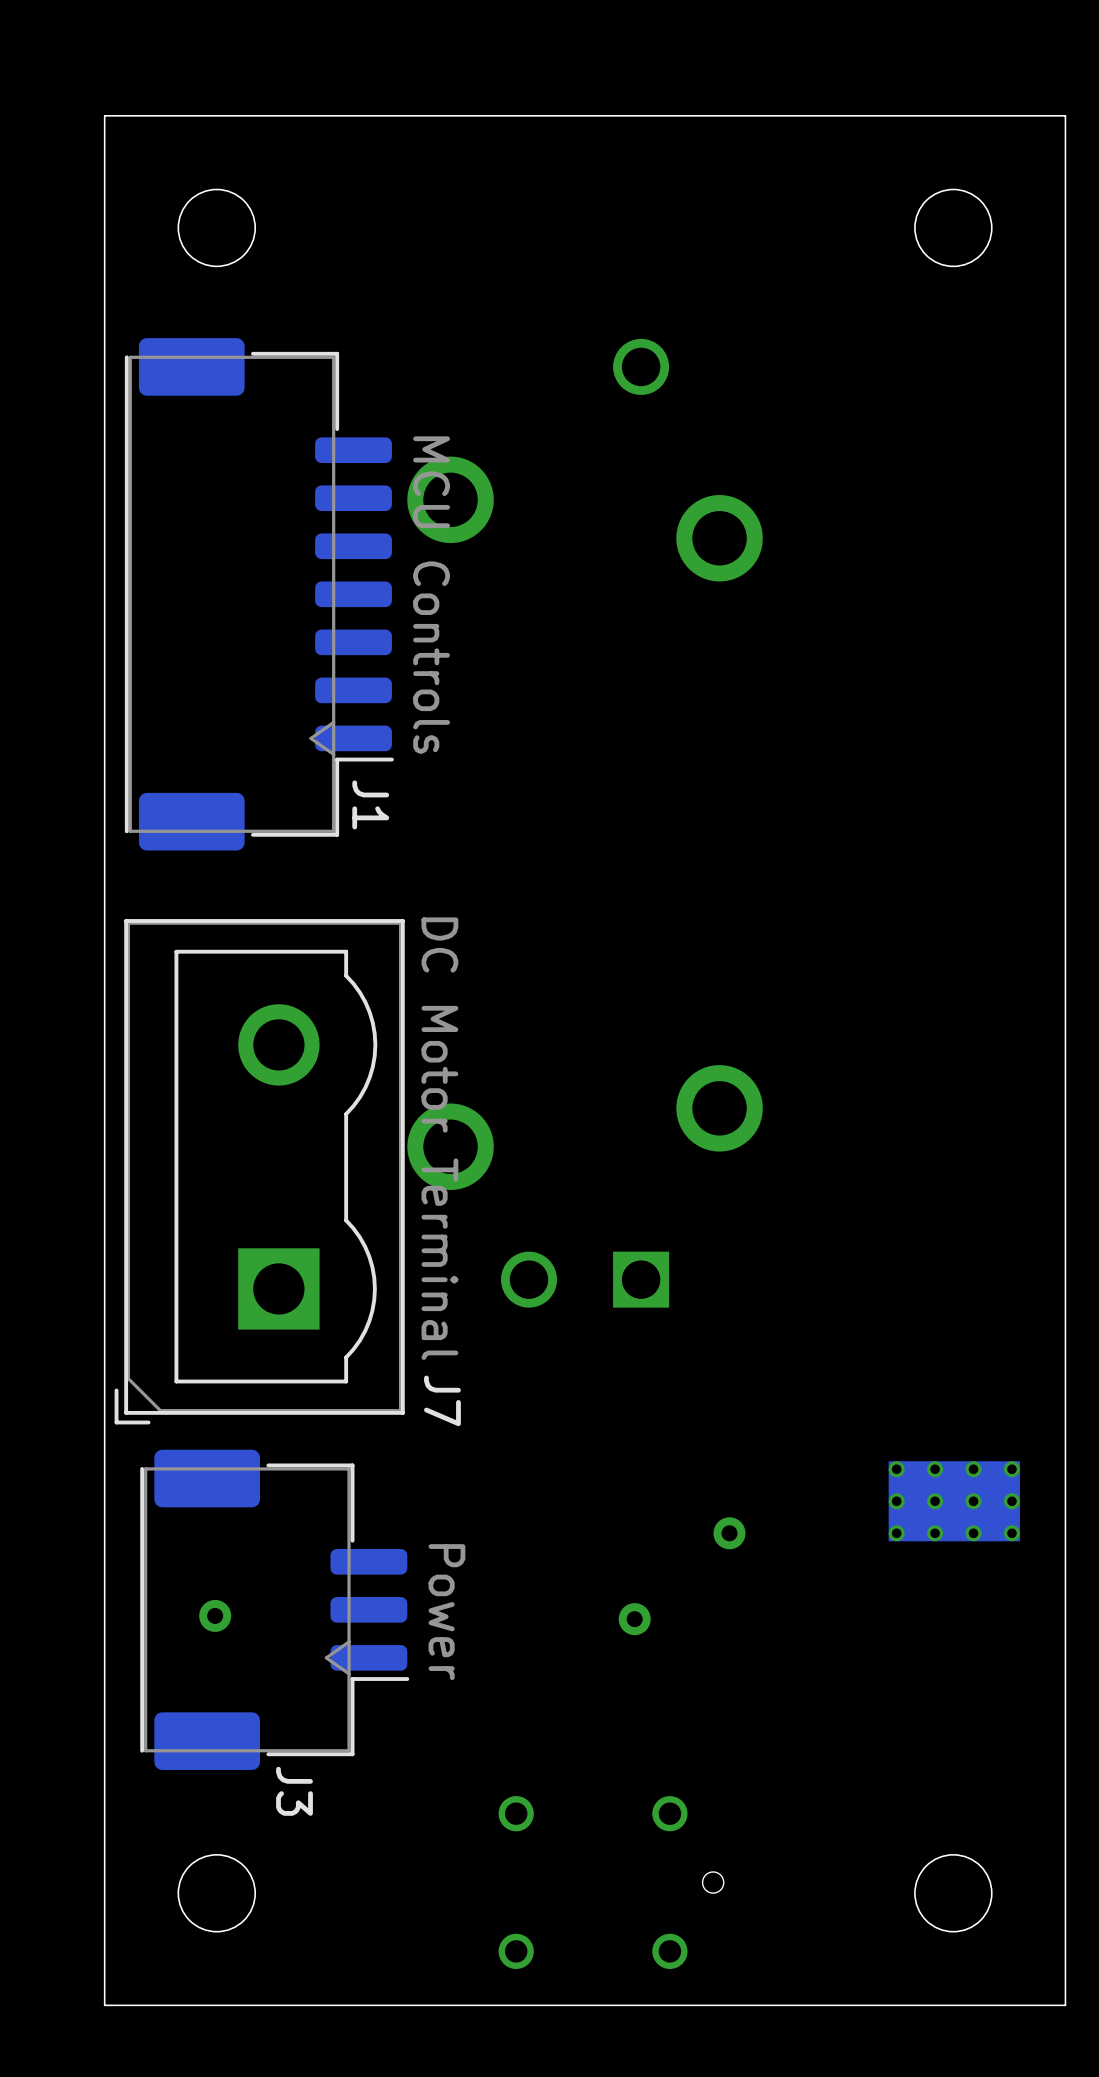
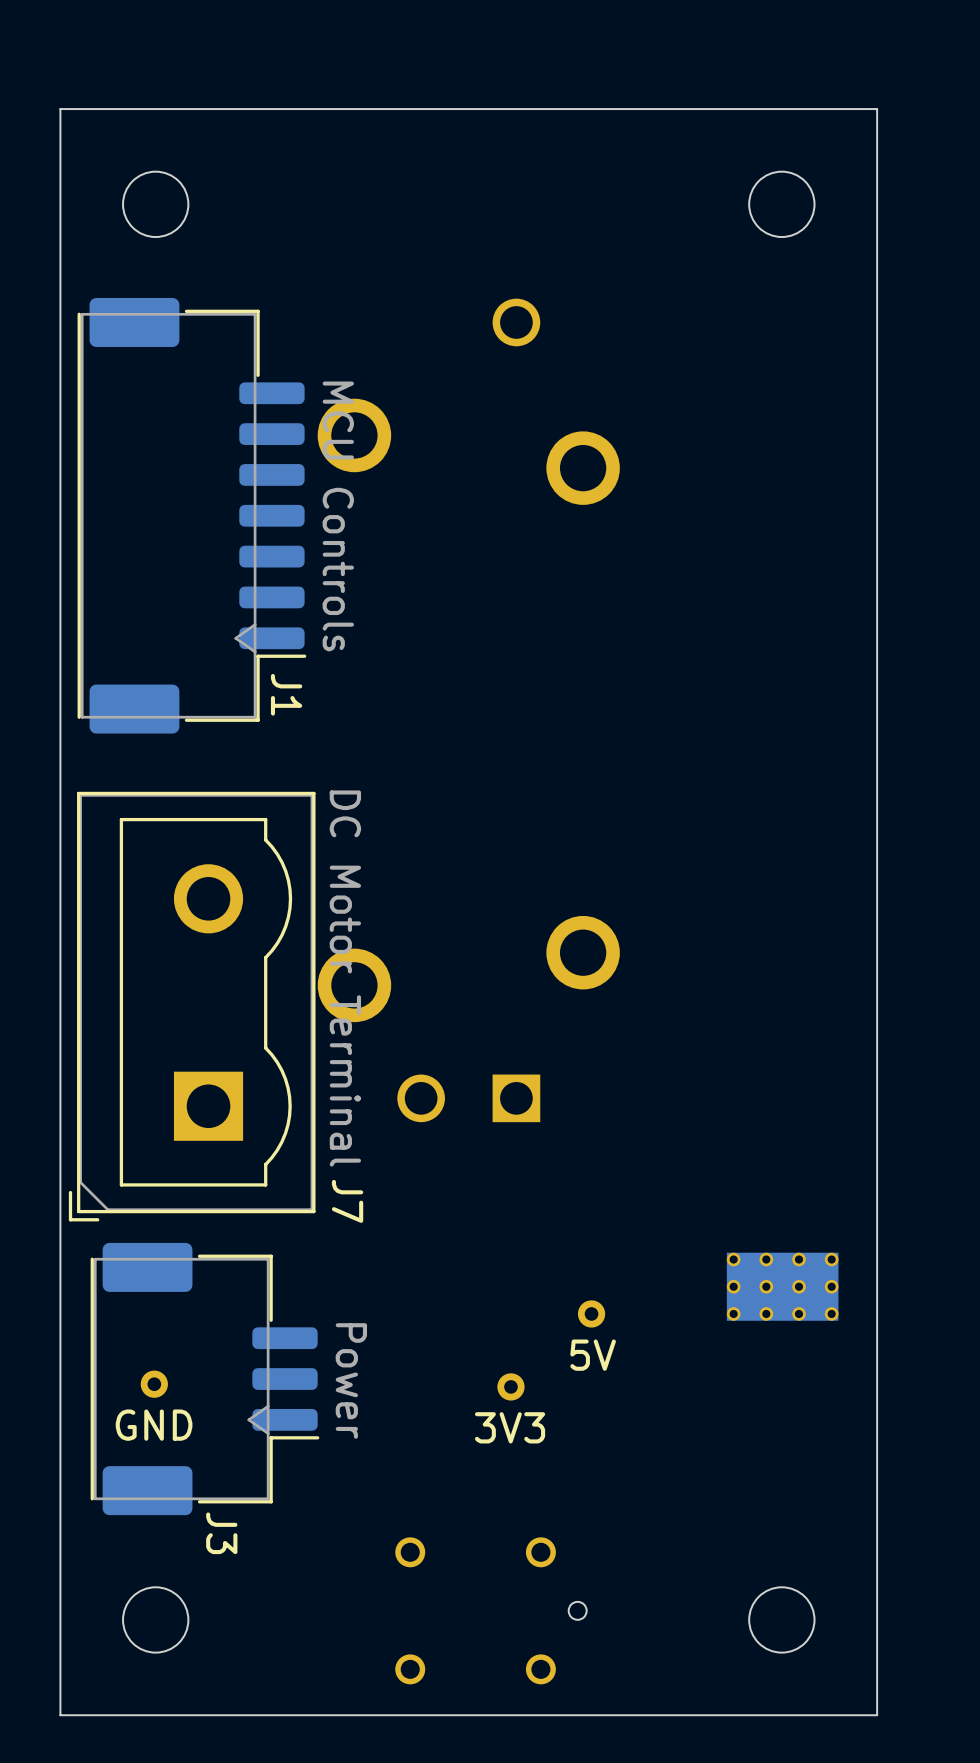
text: none -> 5V (593, 1355)
text: none -> GND (154, 1425)
text: none -> 3V3 (510, 1427)

